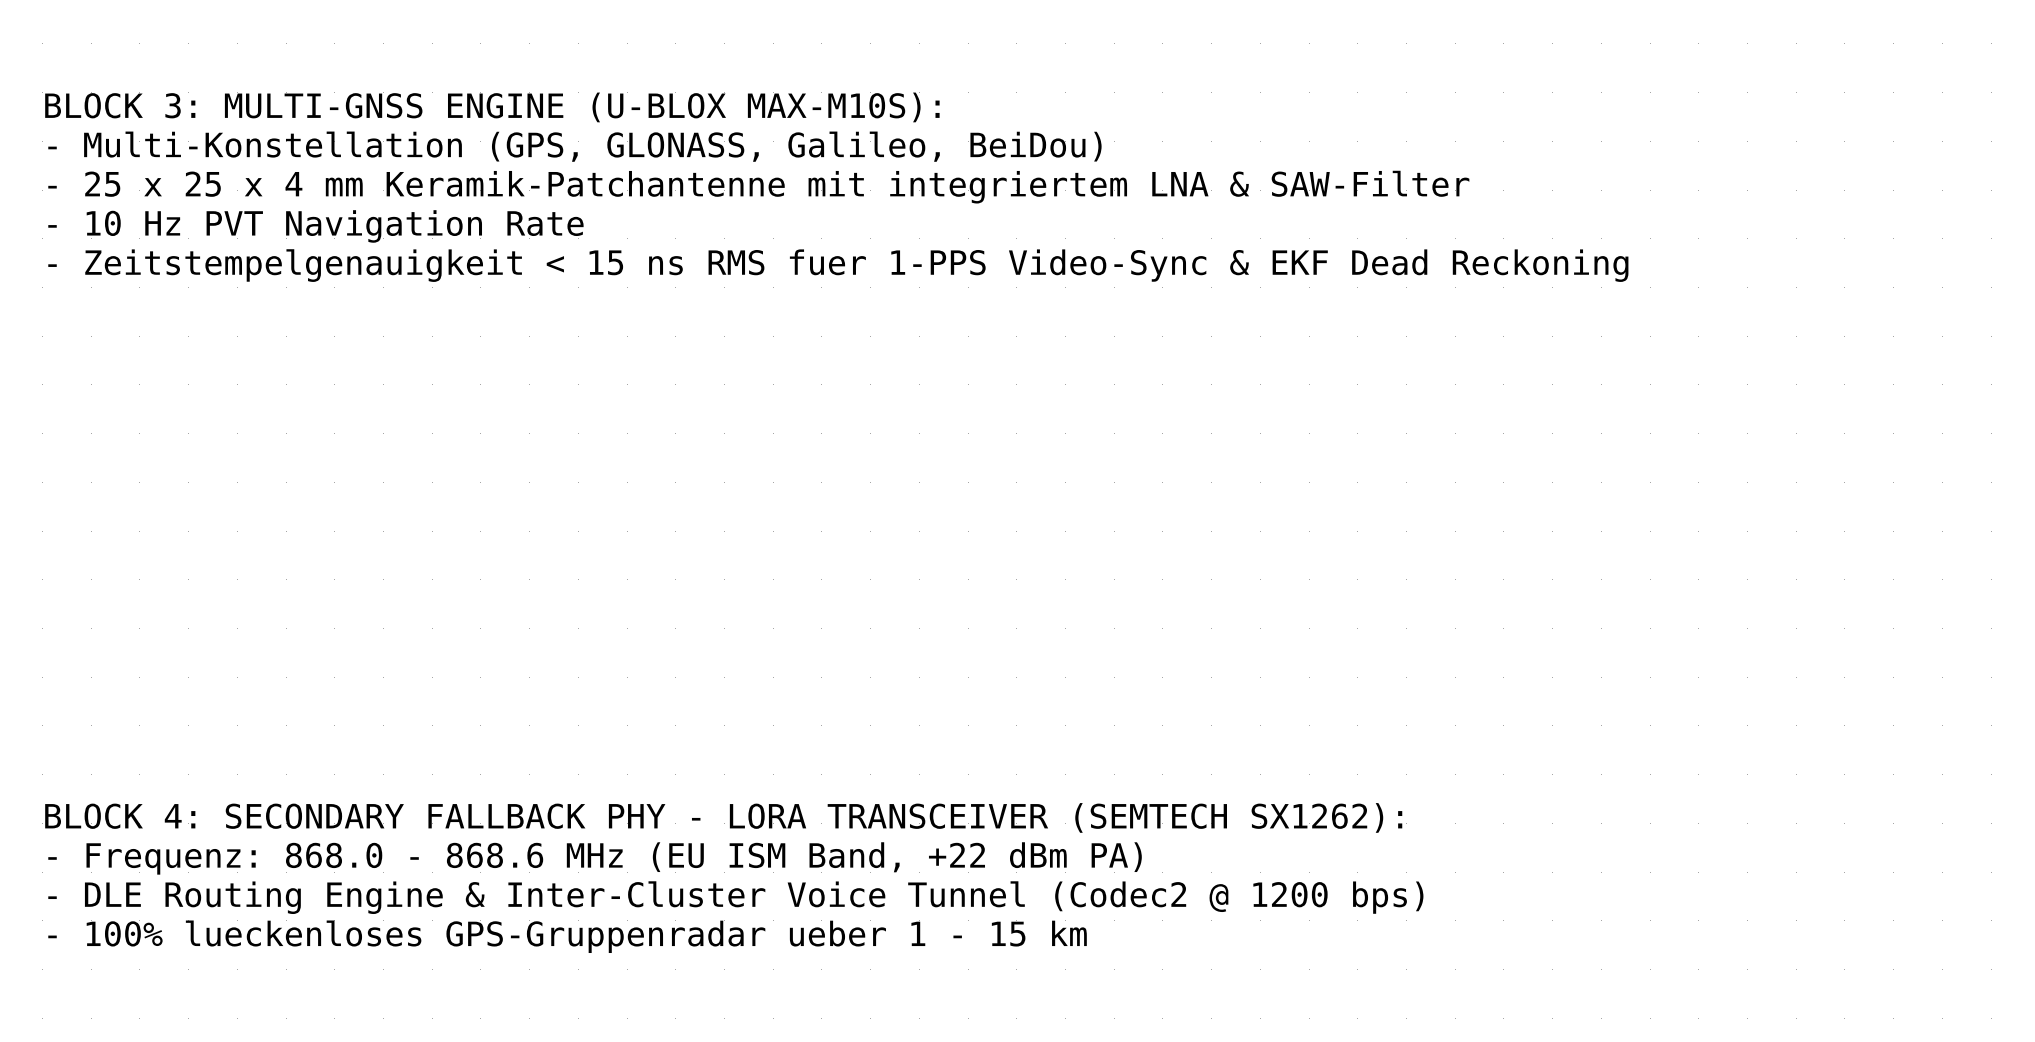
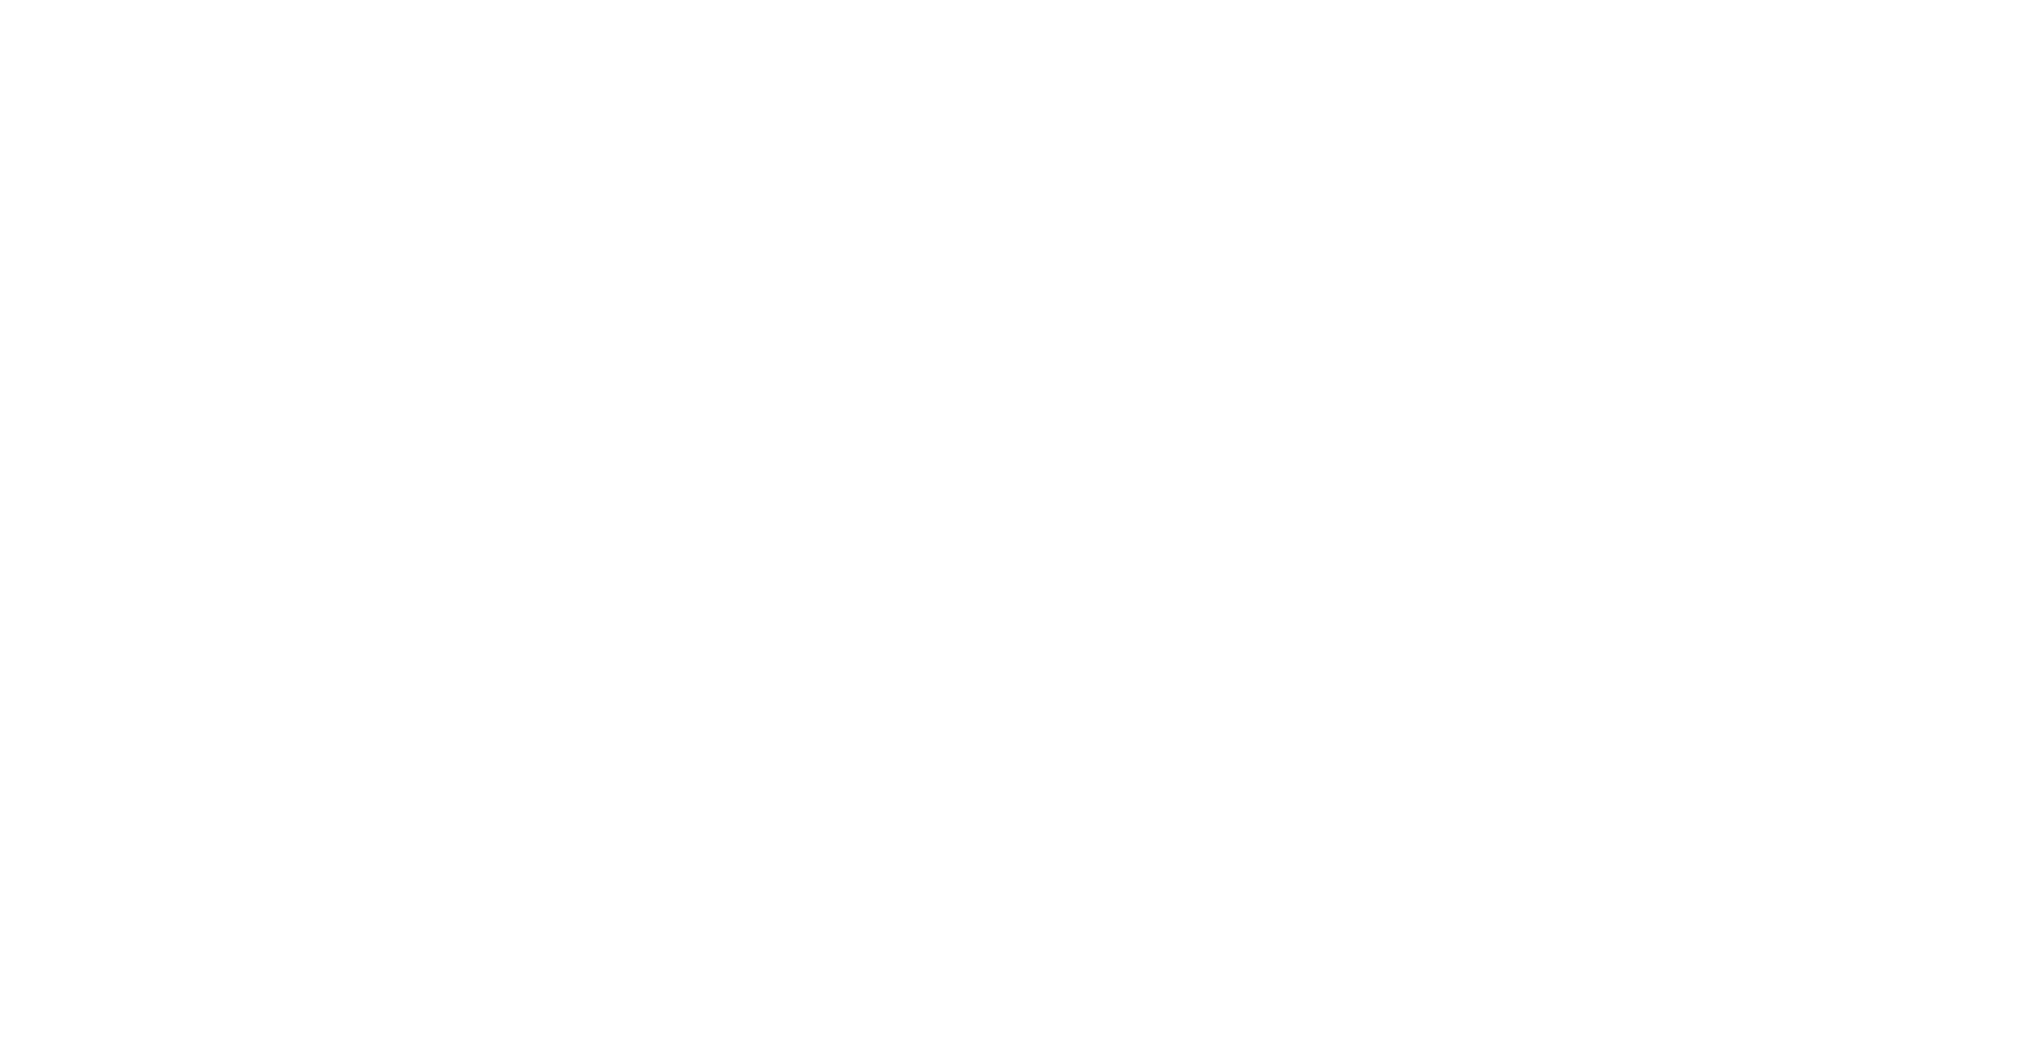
text: BLOCK 3: MULTI-GNSS ENGINE (U-BLOX MAX-M10S): (492, 107) -> none
text: - Multi-Konstellation (GPS, GLONASS, Galileo, BeiDou) (574, 146) -> none
text: - 25 x 25 x 4 mm Keramik-Patchantenne mit integriertem LNA & SAW-Filter (758, 187) -> none
text: - 10 Hz PVT Navigation Rate (315, 226) -> none
text: - Zeitstempelgenauigkeit < 15 ns RMS fuer 1-PPS Video-Sync & EKF Dead Reckoning (838, 265) -> none
text: BLOCK 4: SECONDARY FALLBACK PHY - LORA TRANSCEIVER (SEMTECH SX1262): (723, 817) -> none
text: - Frequenz: 868.0 - 868.6 MHz (EU ISM Band, +22 dBm PA) (595, 858) -> none
text: - DLE Routing Engine & Inter-Cluster Voice Tunnel (Codec2 @ 1200 bps) (735, 897) -> none
text: - 100% lueckenloses GPS-Gruppenradar ueber 1 - 15 km (567, 936) -> none

